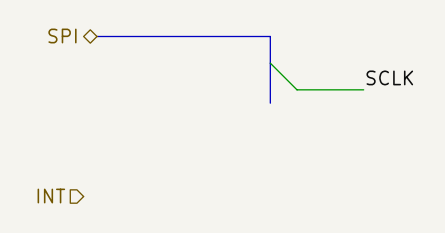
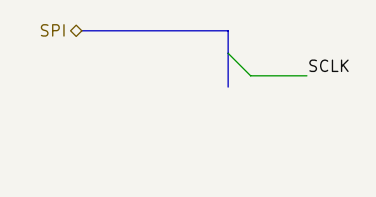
hierarchical label: INT (51, 196) -> none

